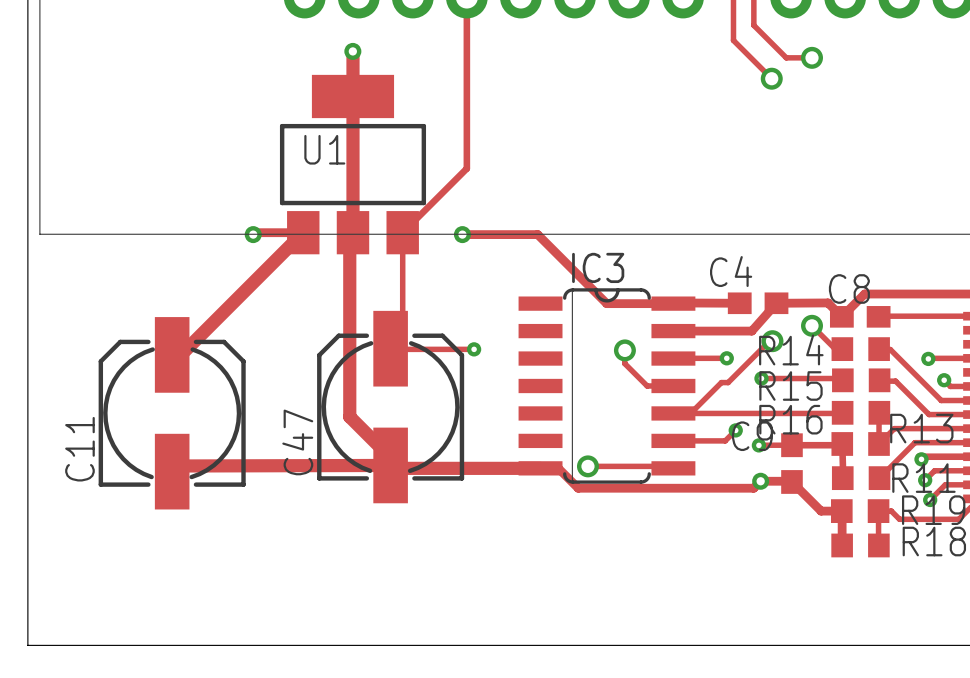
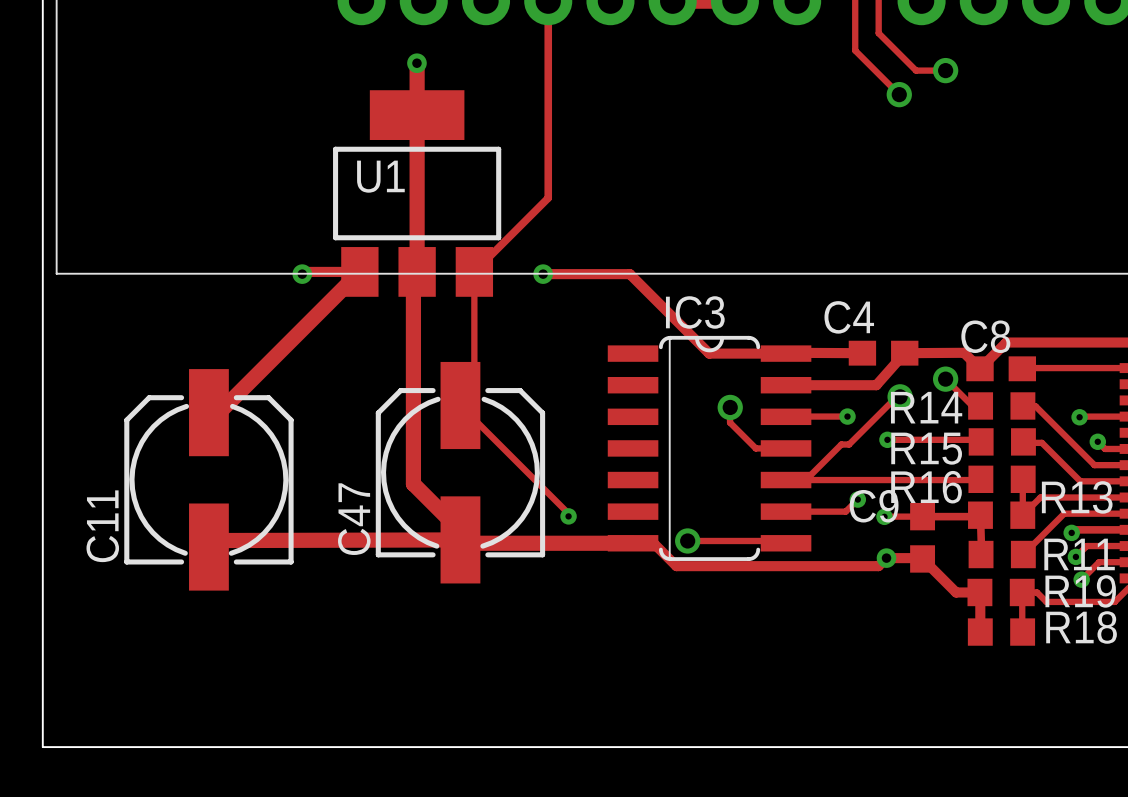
track: none -> (460, 405) (568, 513) (568, 516)
track: (385, 349) (474, 349) -> none
via position: (474, 349) -> (568, 516)

